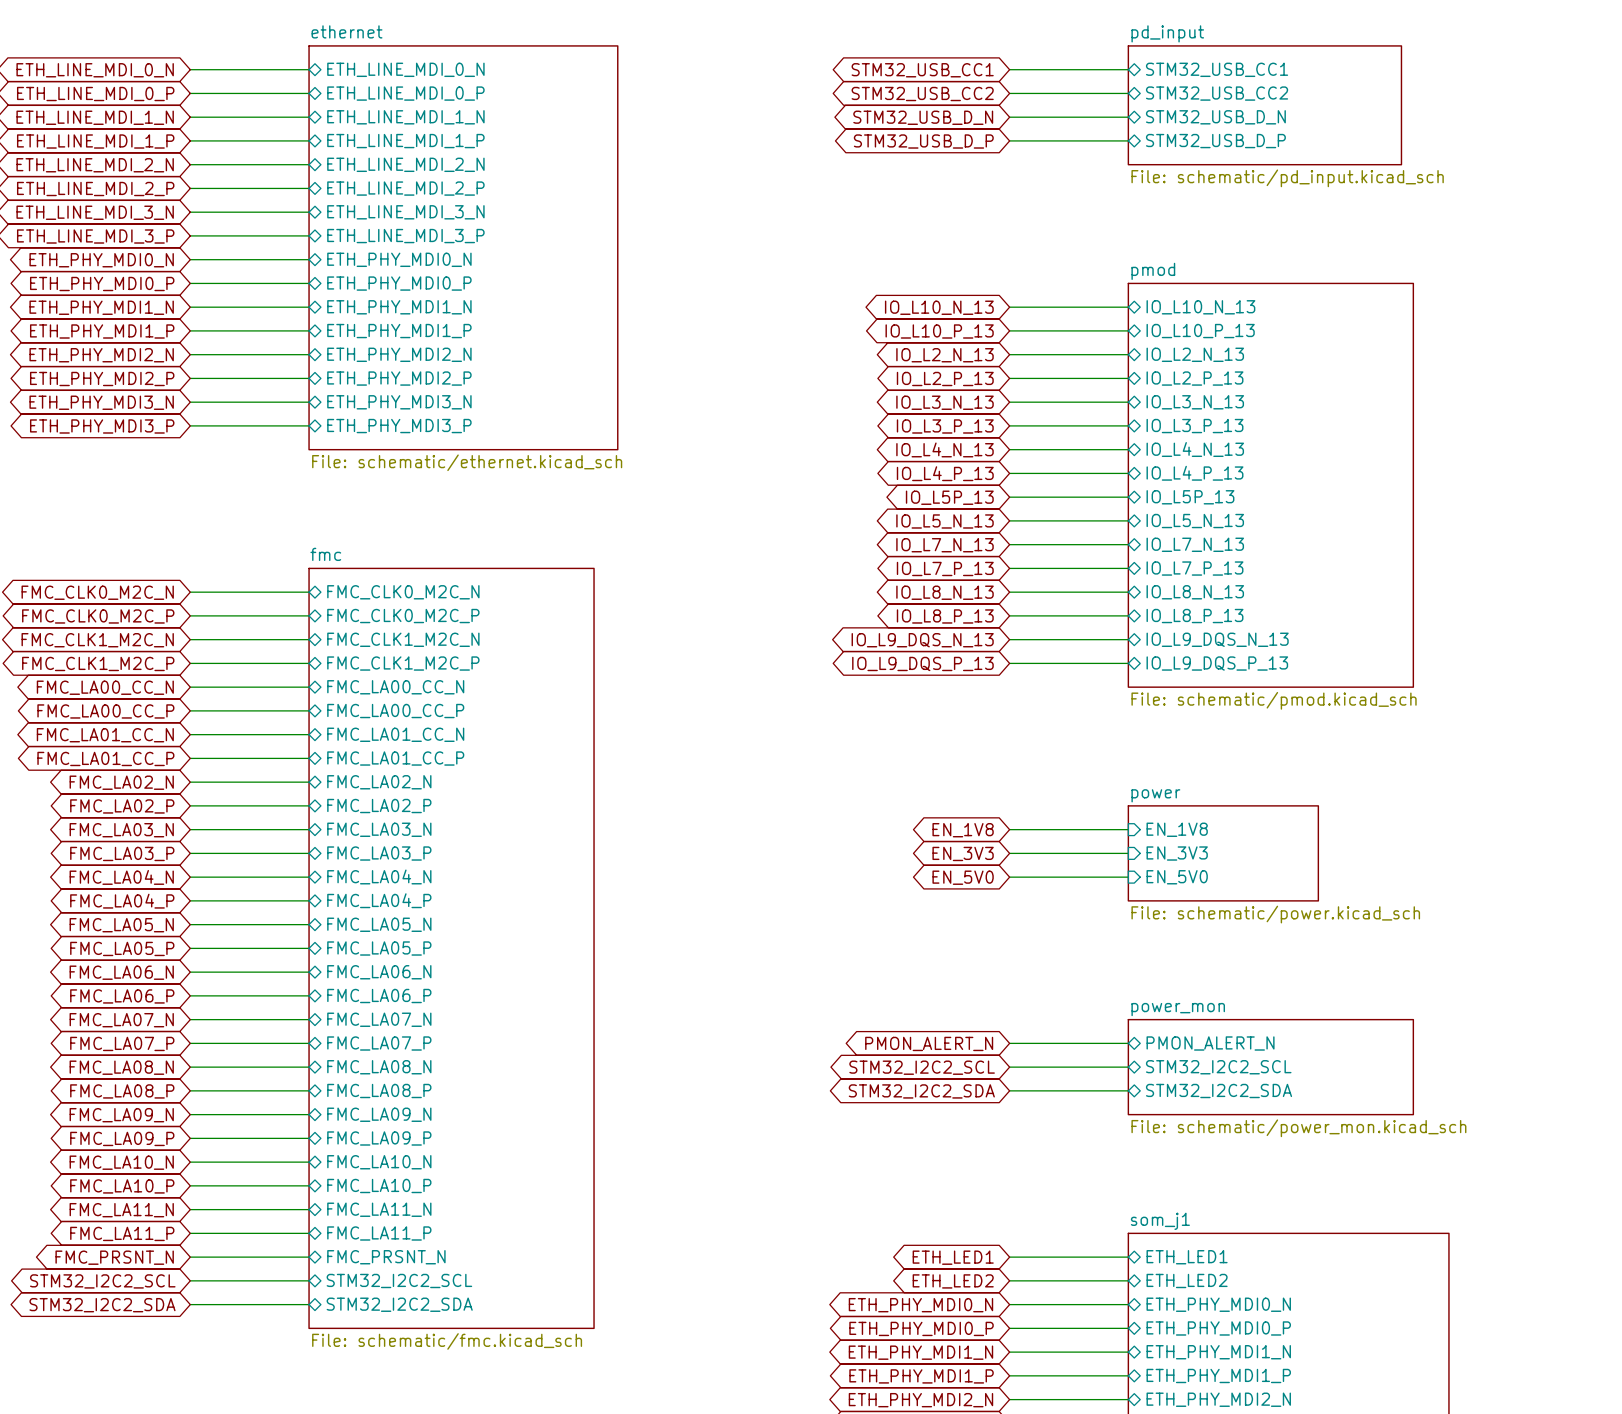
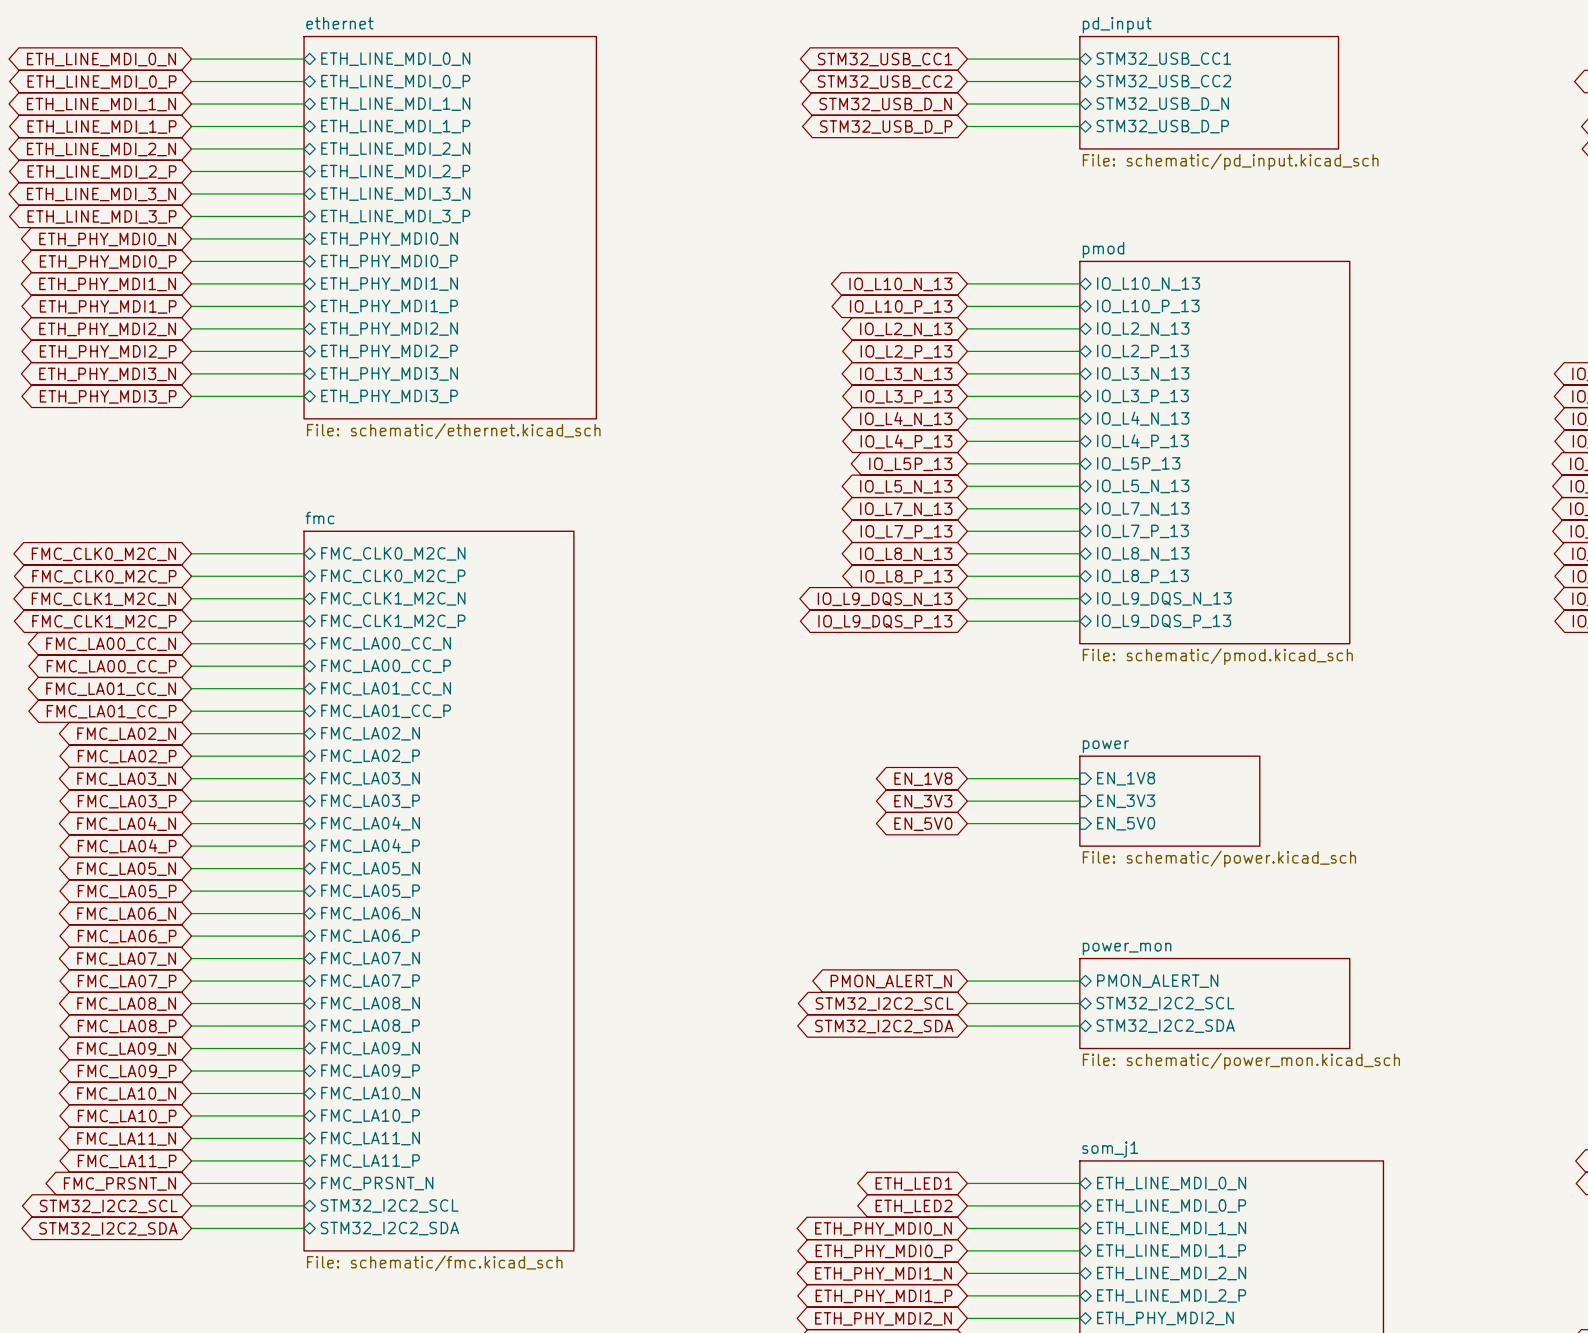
sheet pin: ETH_LED1 (1187, 1257) -> ETH_LINE_MDI_0_N (1171, 1183)
sheet pin: ETH_LED2 (1187, 1280) -> ETH_LINE_MDI_0_P (1171, 1206)
sheet pin: ETH_PHY_MDI0_N (1218, 1304) -> ETH_LINE_MDI_1_N (1171, 1228)
sheet pin: ETH_PHY_MDI0_P (1218, 1328) -> ETH_LINE_MDI_1_P (1171, 1251)
sheet pin: ETH_PHY_MDI1_N (1218, 1352) -> ETH_LINE_MDI_2_N (1171, 1273)
sheet pin: ETH_PHY_MDI1_P (1218, 1375) -> ETH_LINE_MDI_2_P (1171, 1295)

